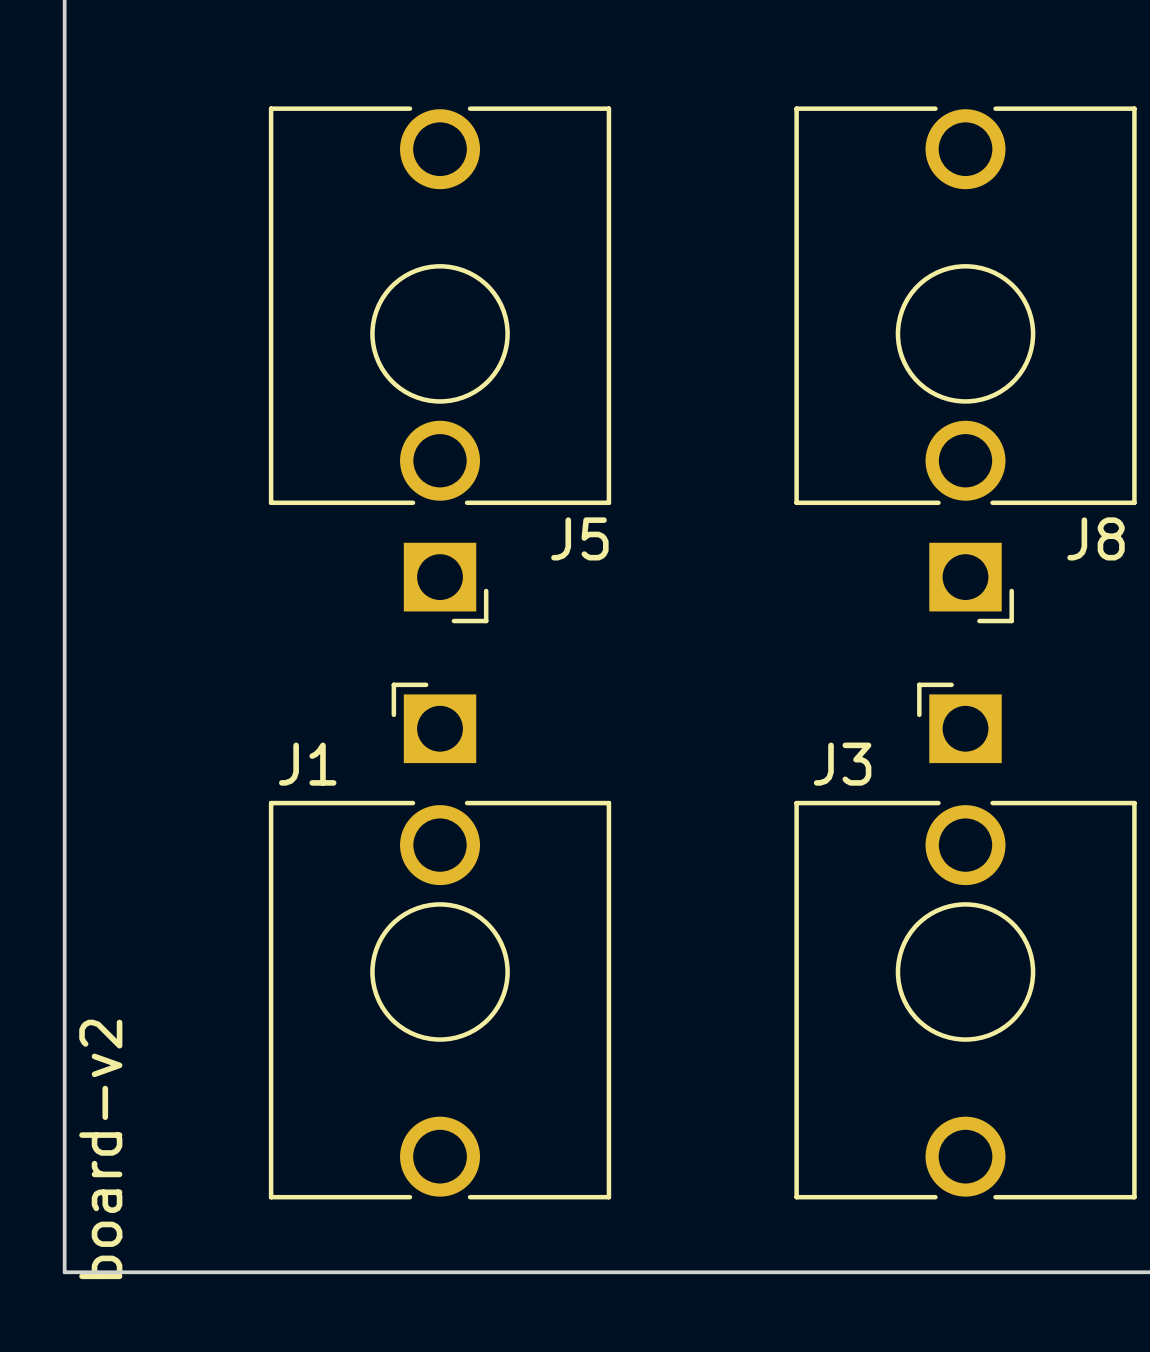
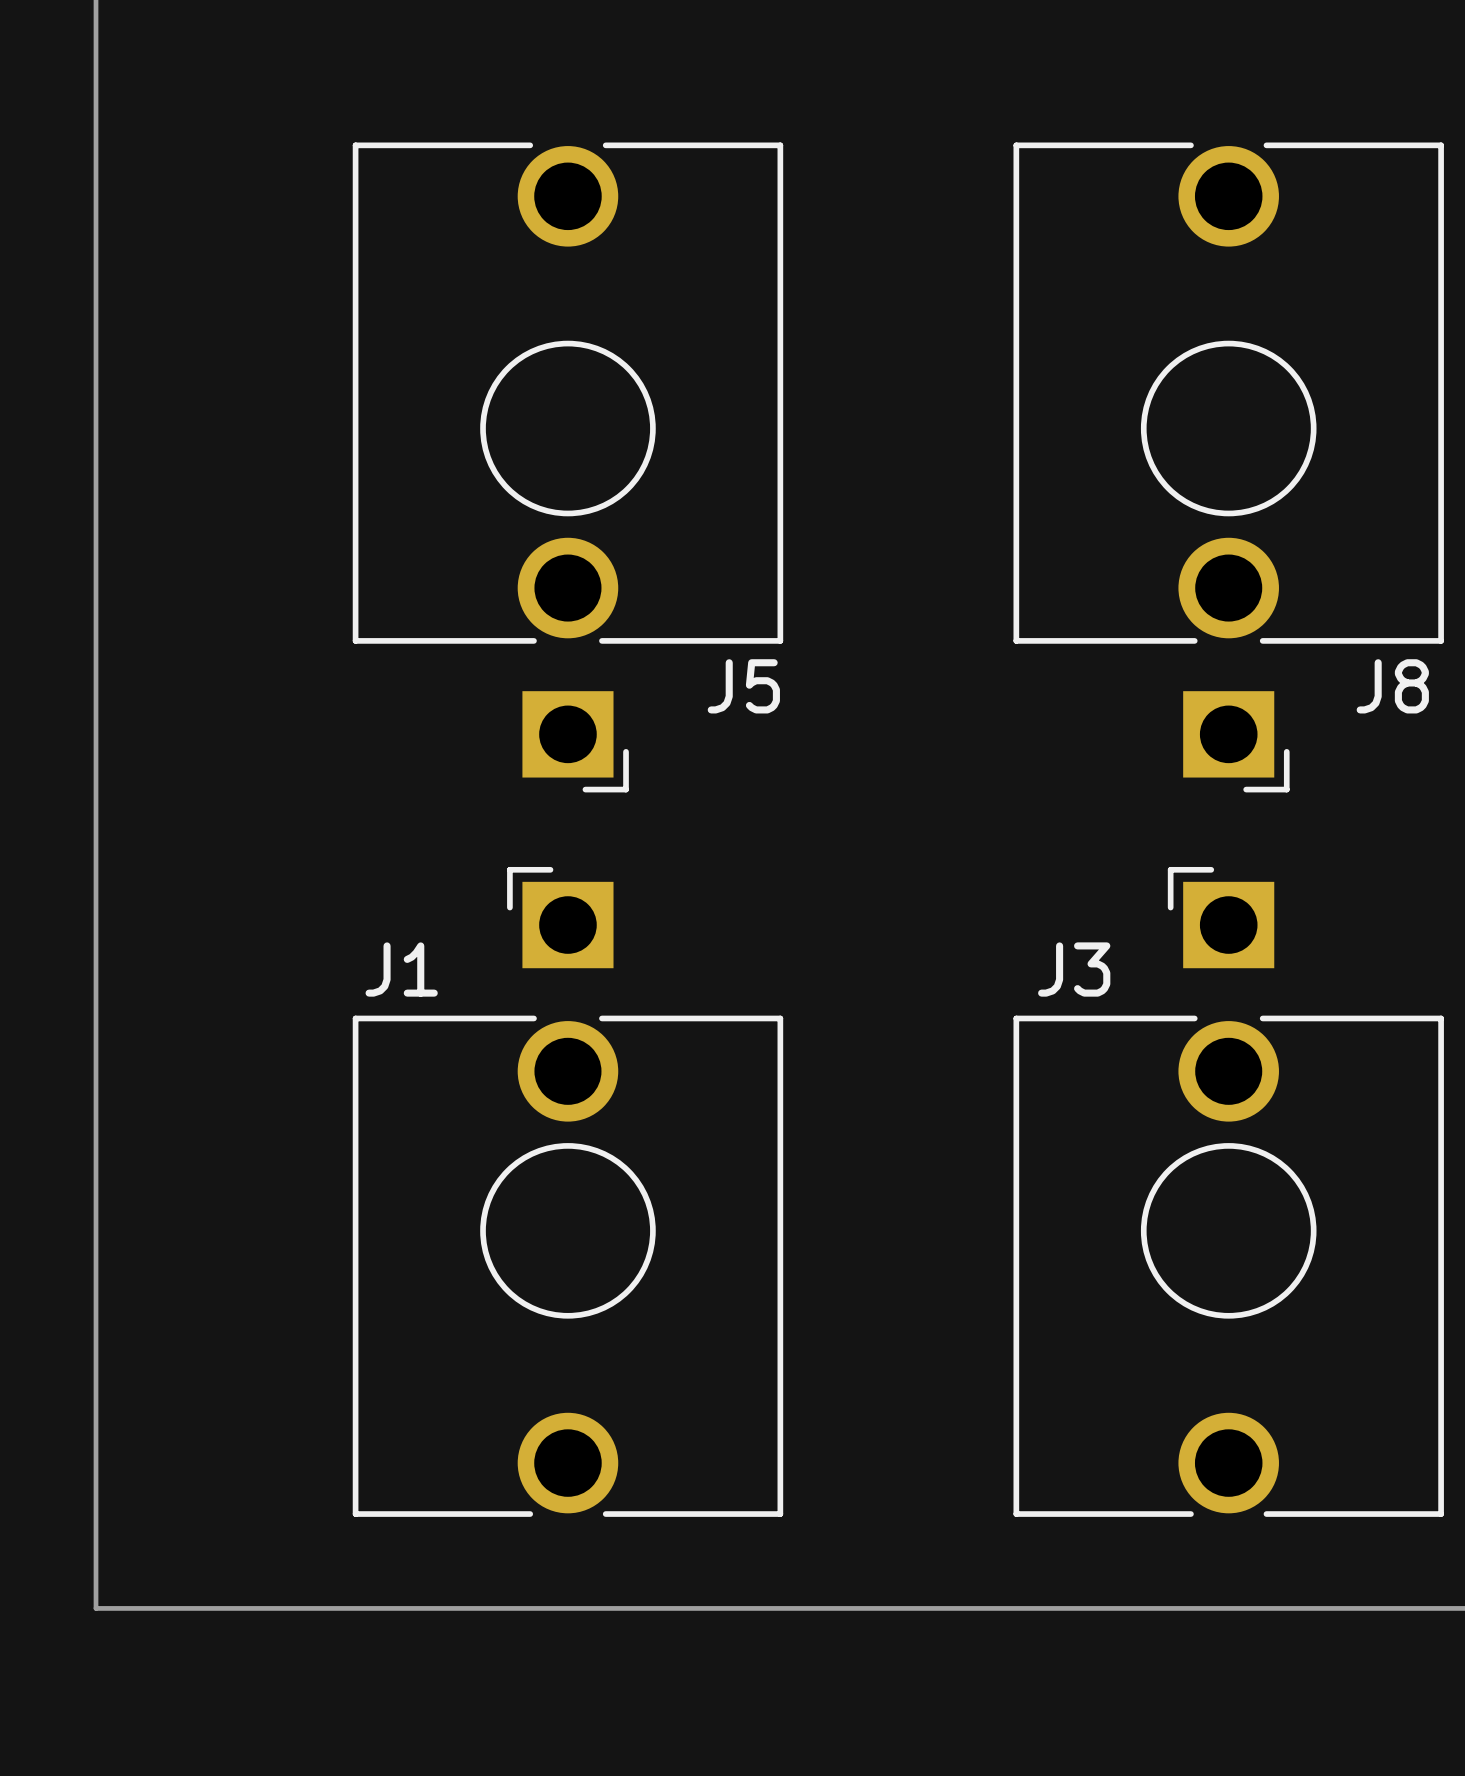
text: board-v2 (100, 1149) -> none

